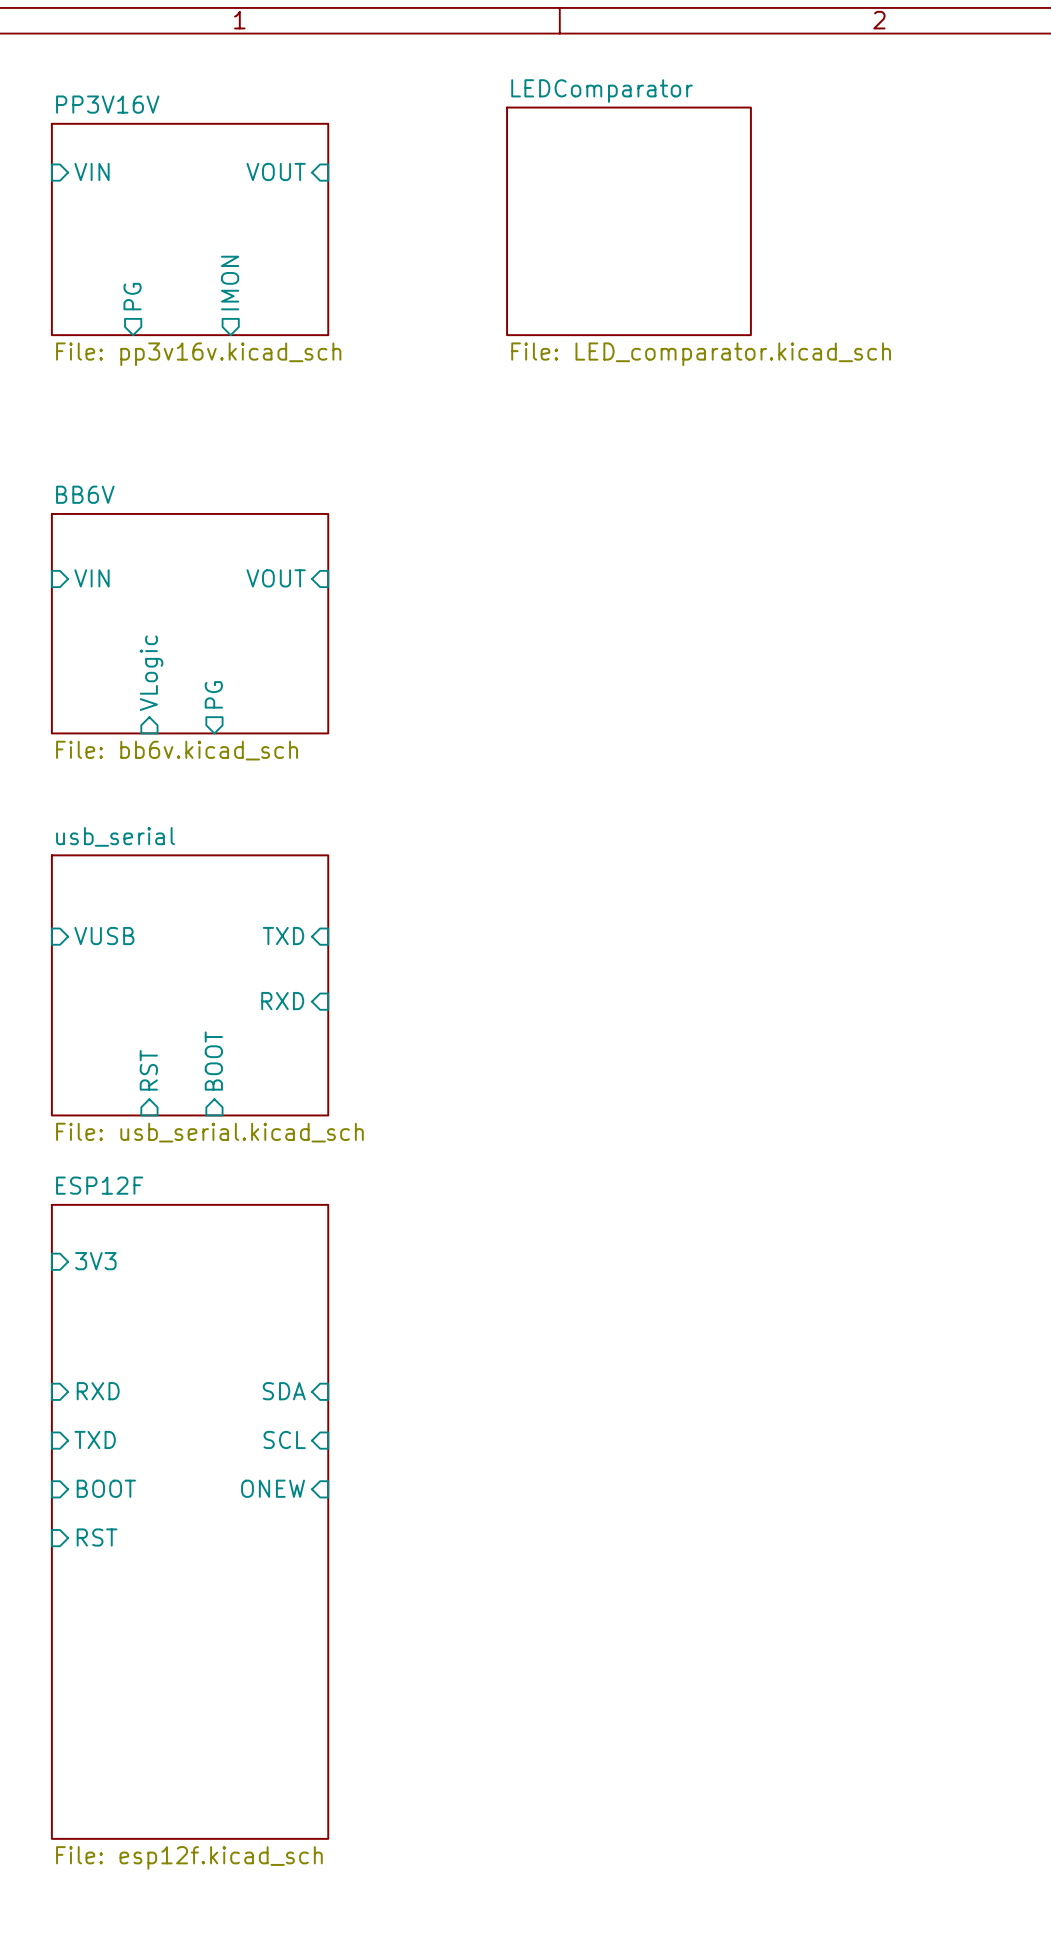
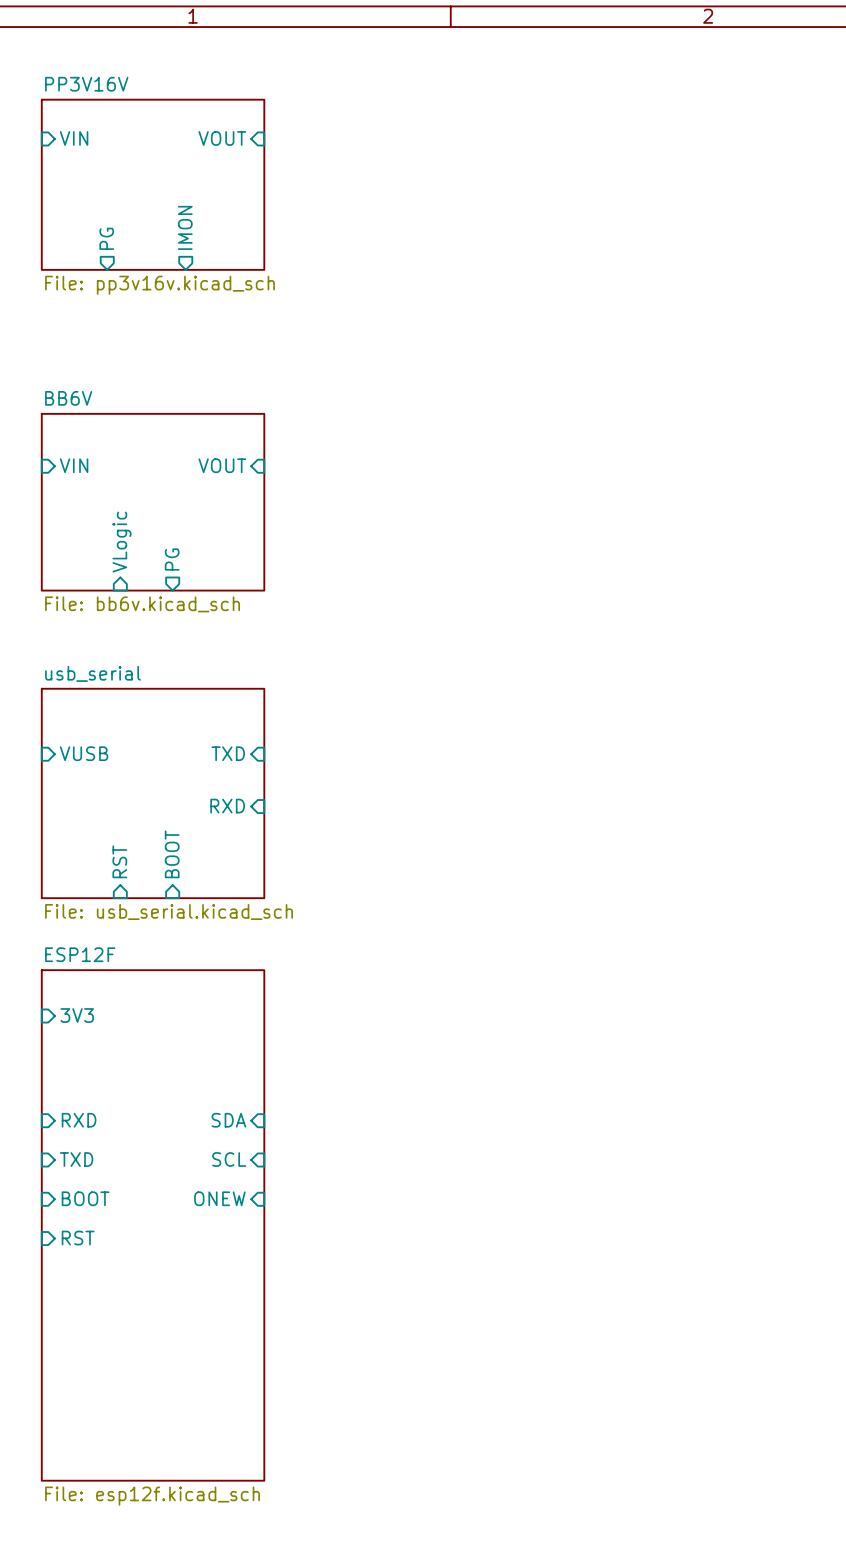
sheet LEDComparator: File: LED_comparator.kicad_sch (628, 221) -> none

